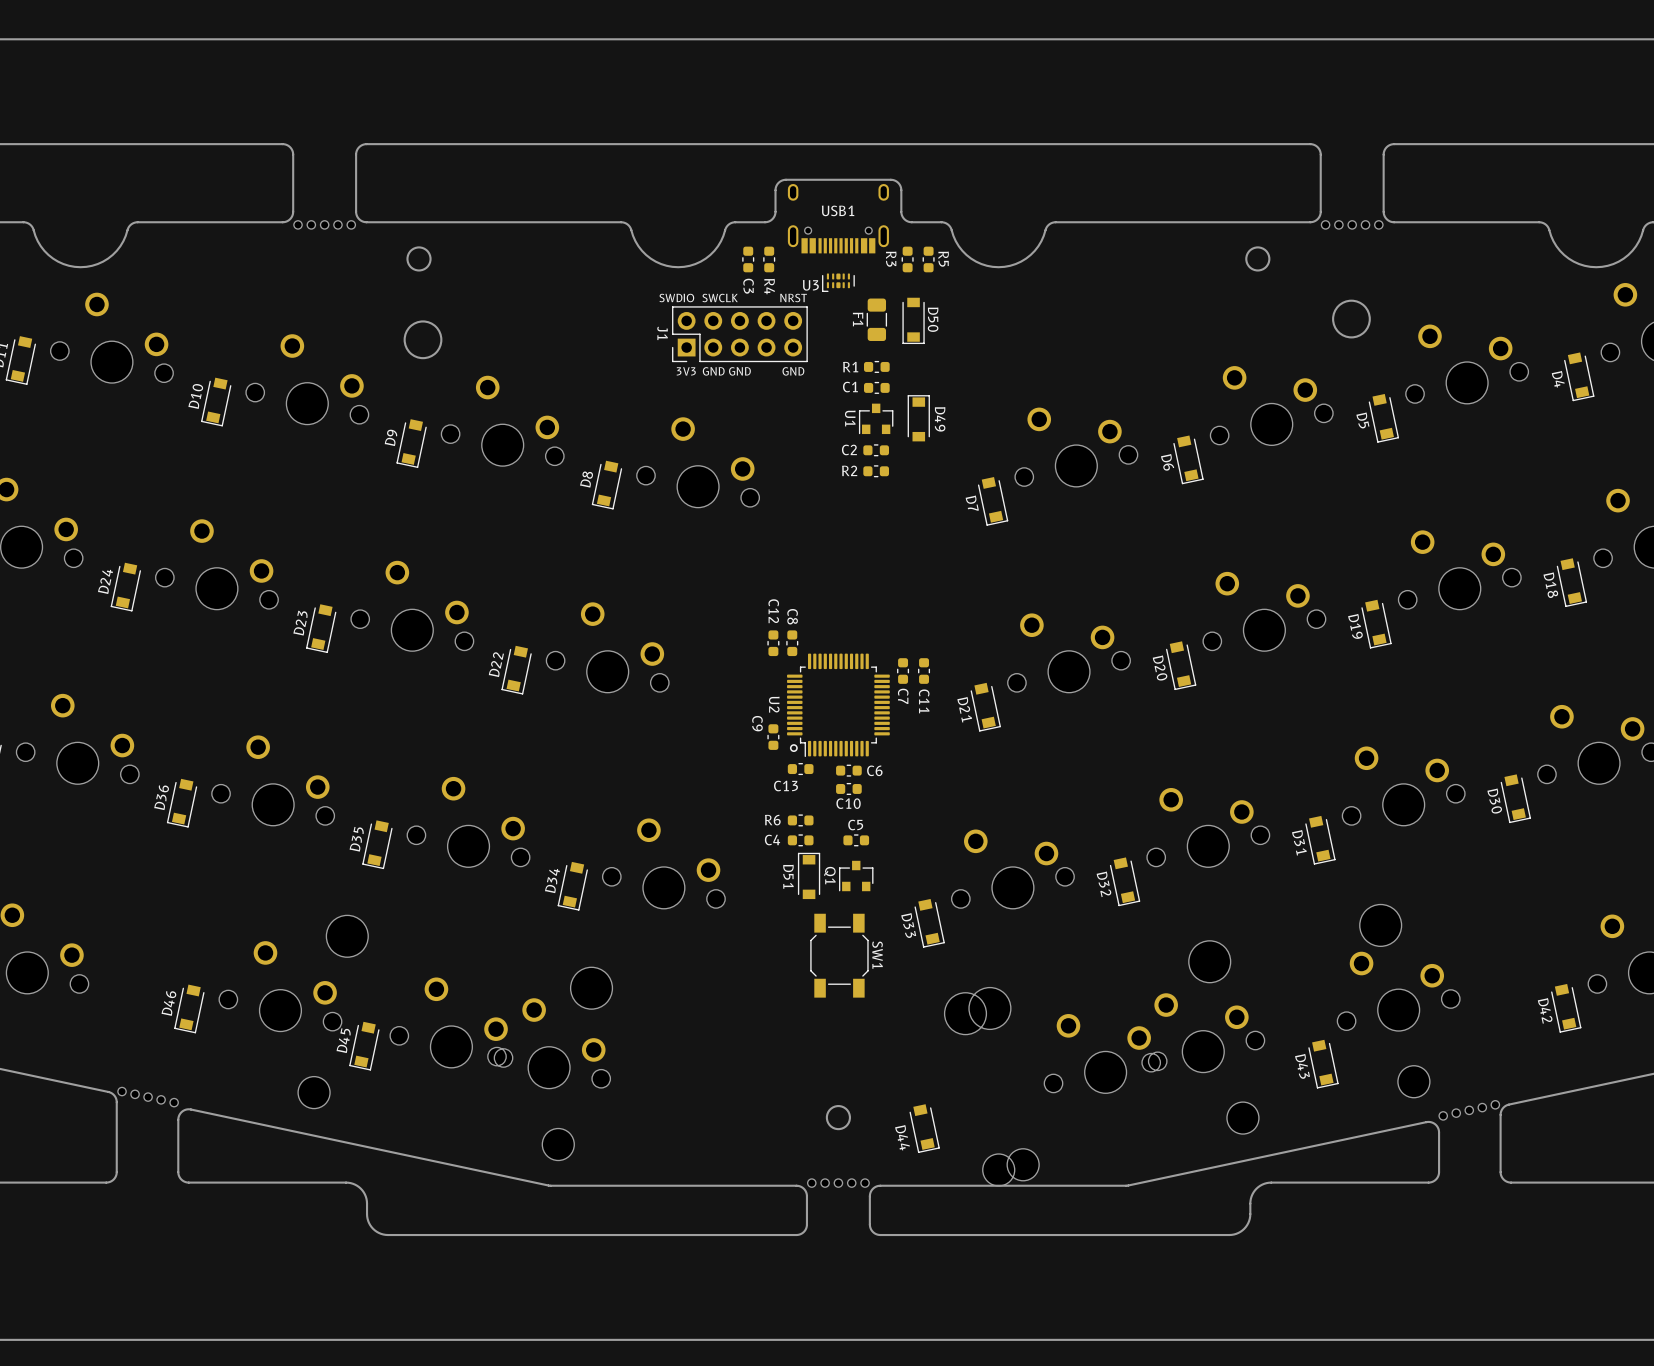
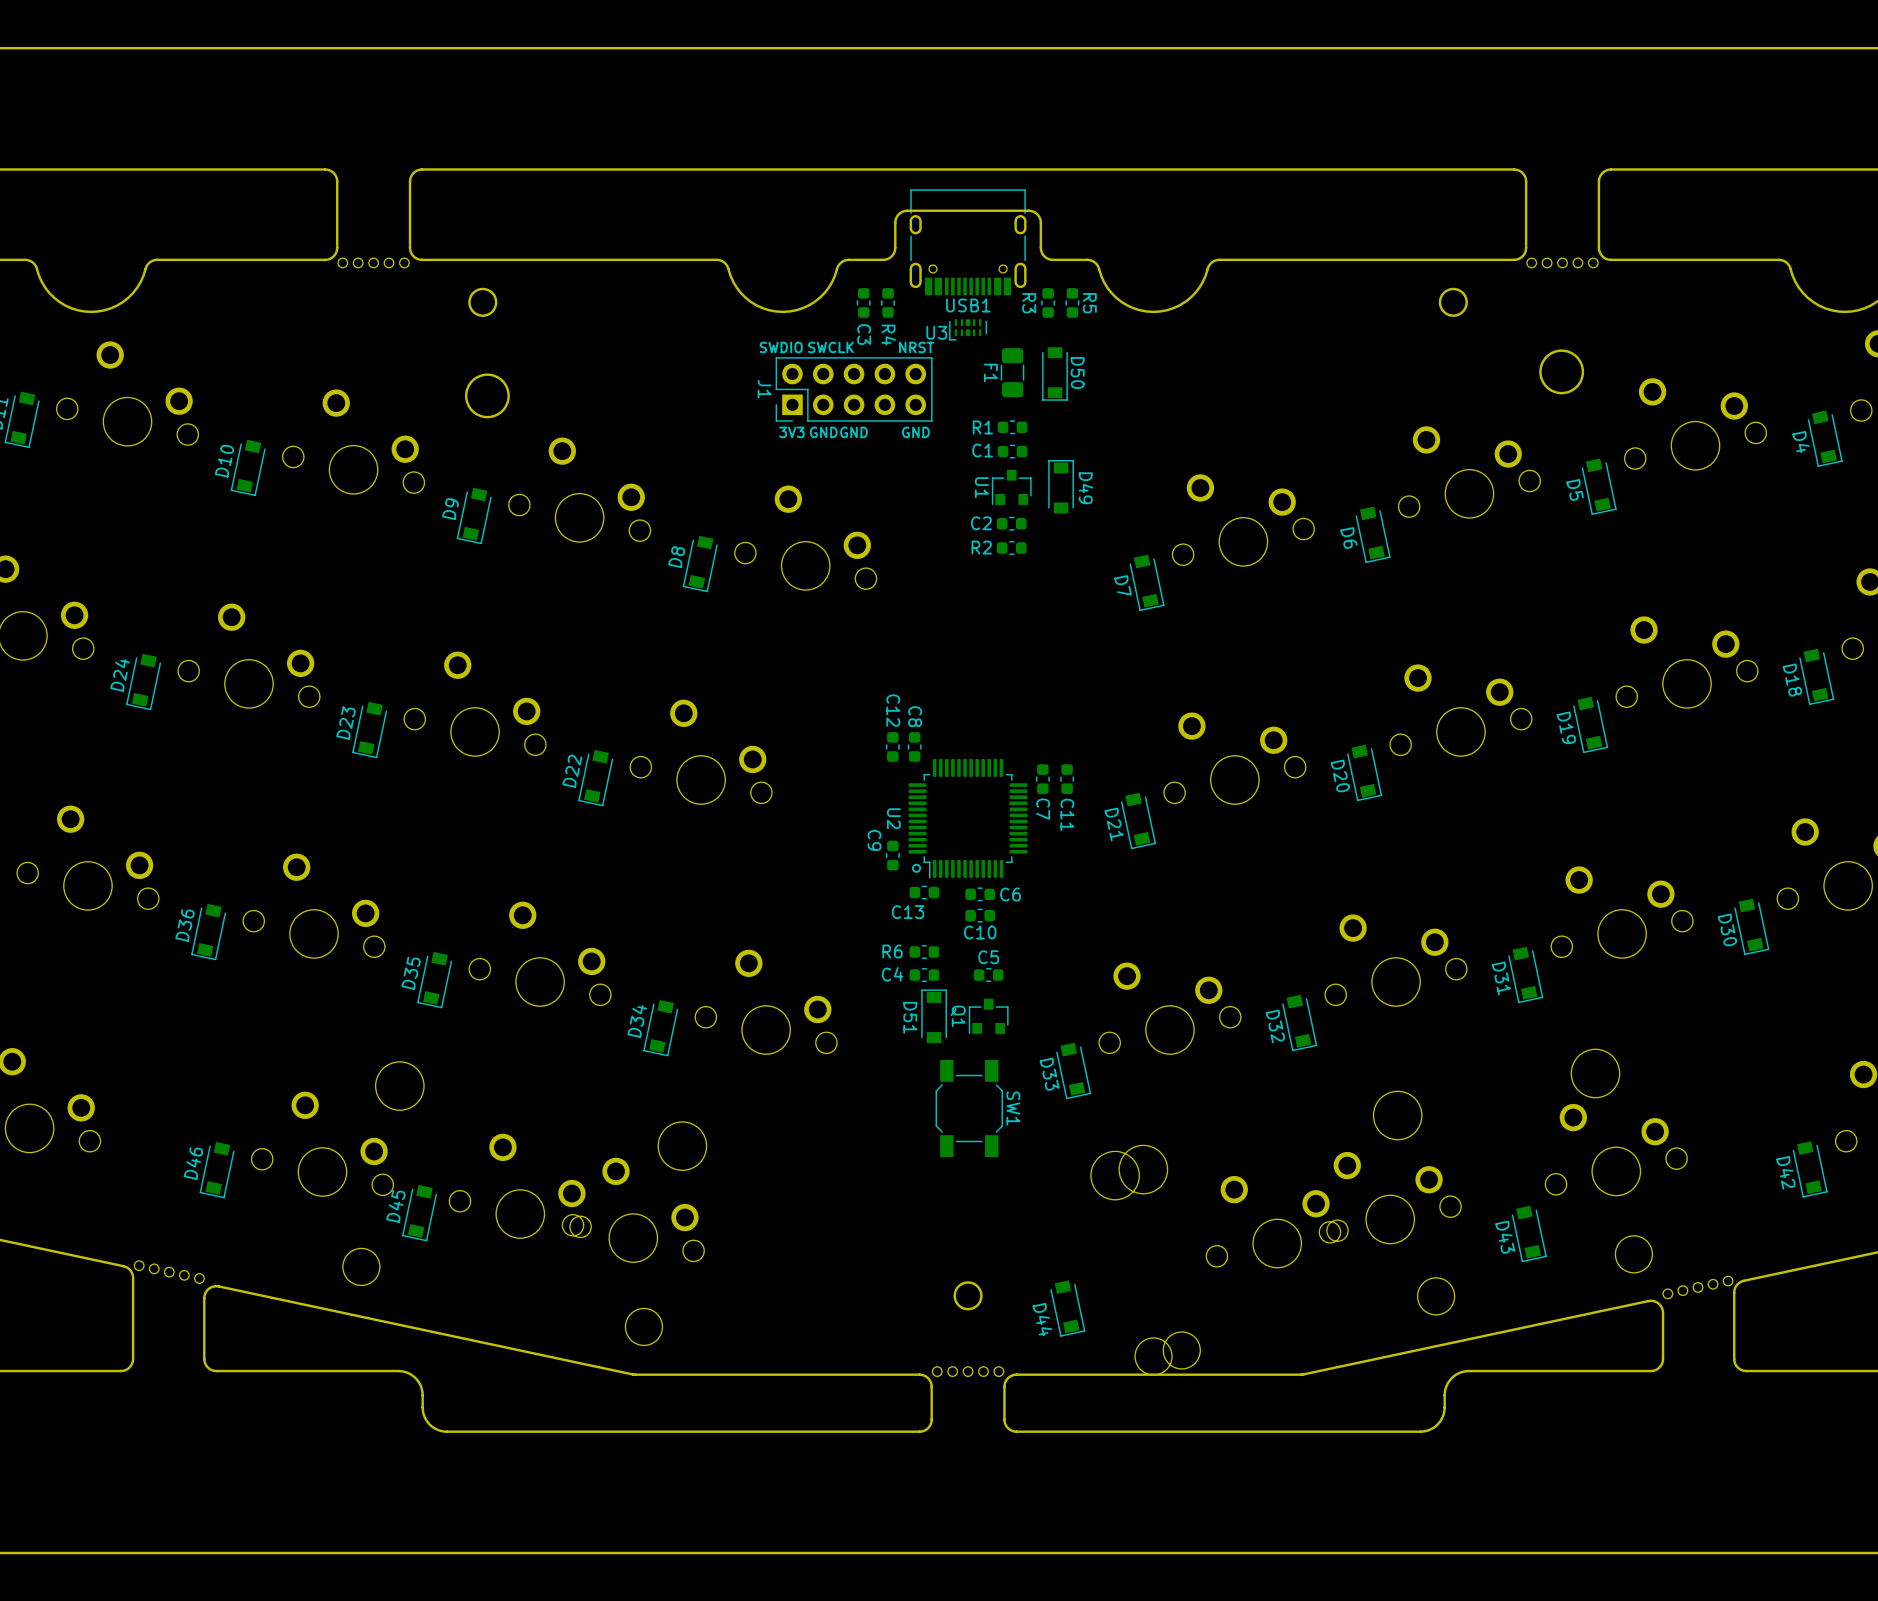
USB1 footprint: [787, 183, 889, 254] -> [909, 189, 1027, 296]
USB1 name position: USB1 (838, 210) -> USB1 (968, 305)

